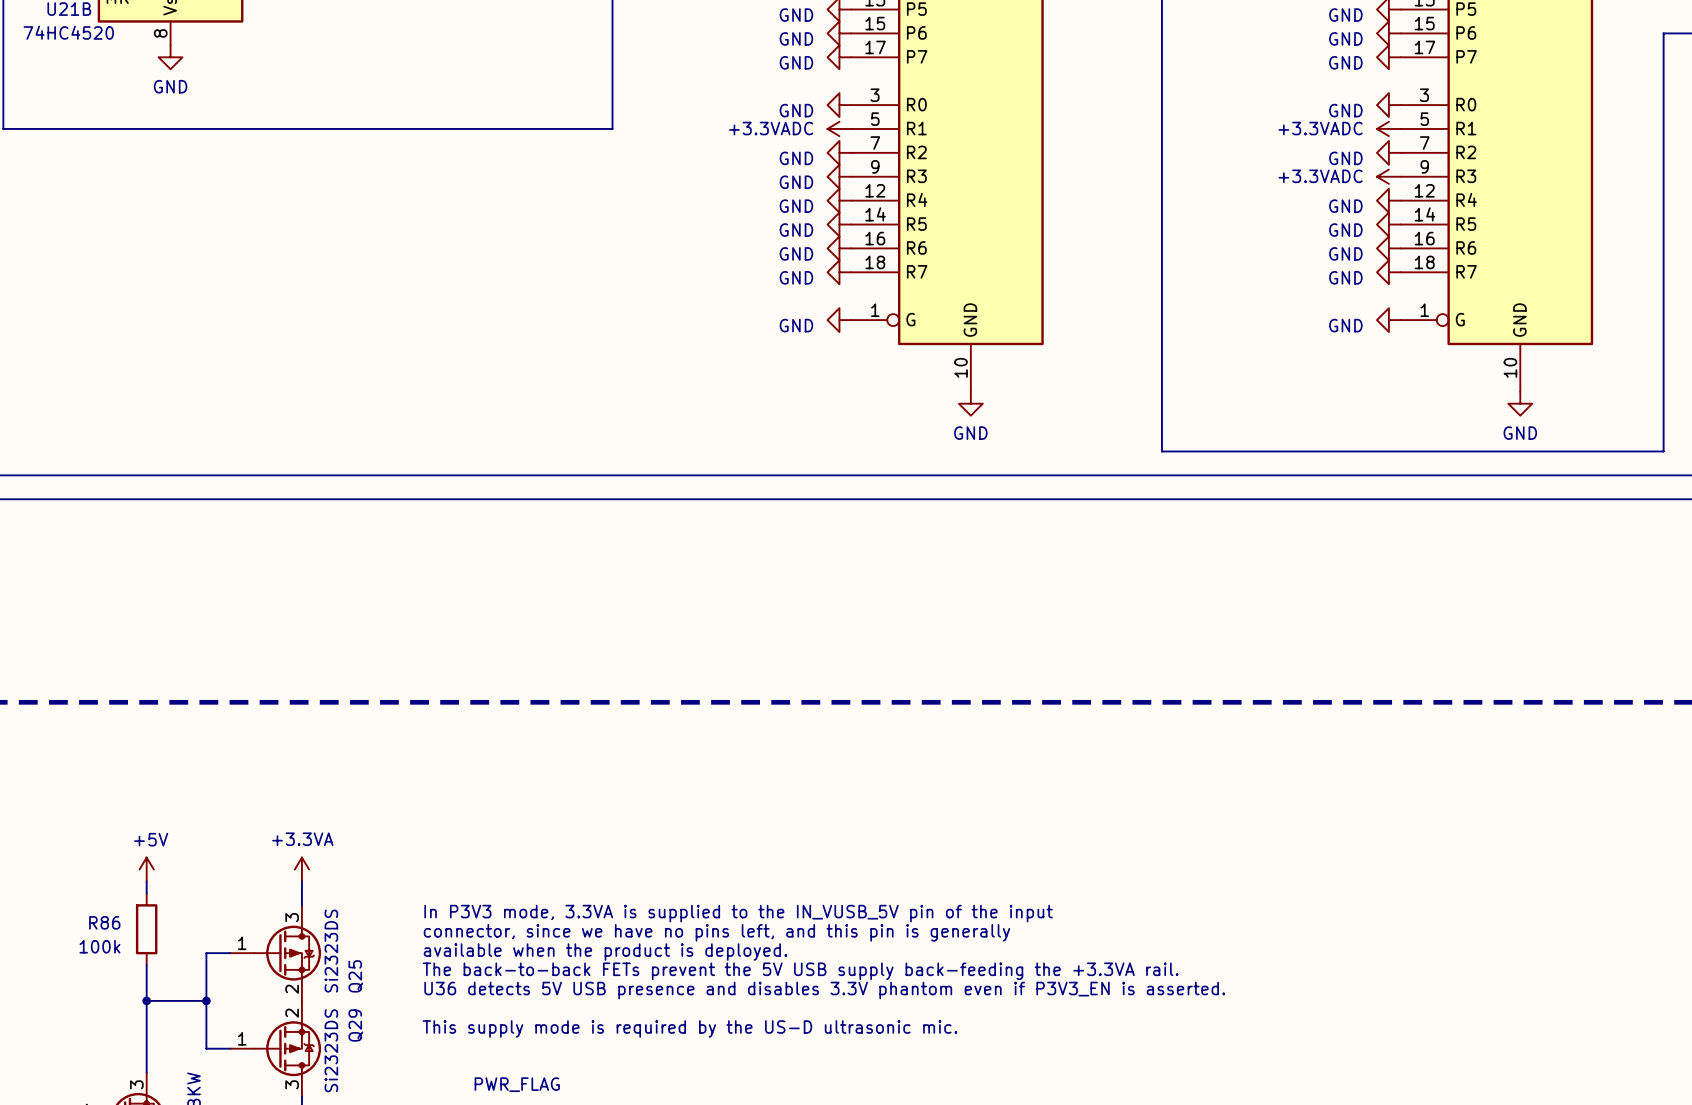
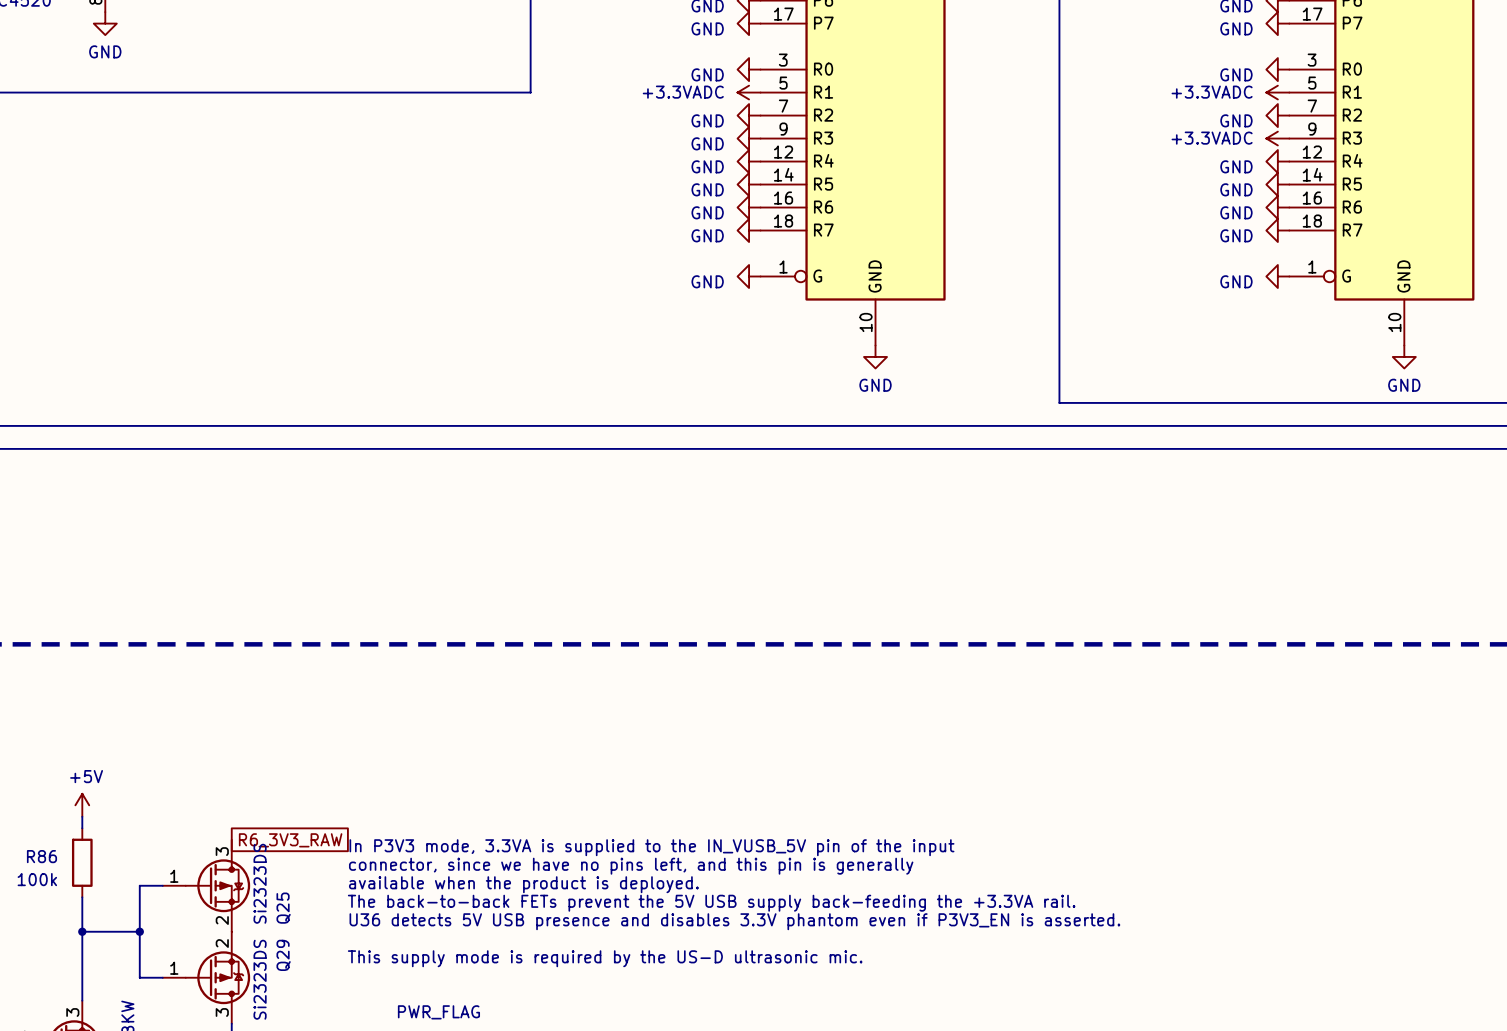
power symbol: +3.3VA (301, 869) -> none
wire: (301, 881) (301, 905) -> none
global label: none -> R6_3V3_RAW (290, 840)

